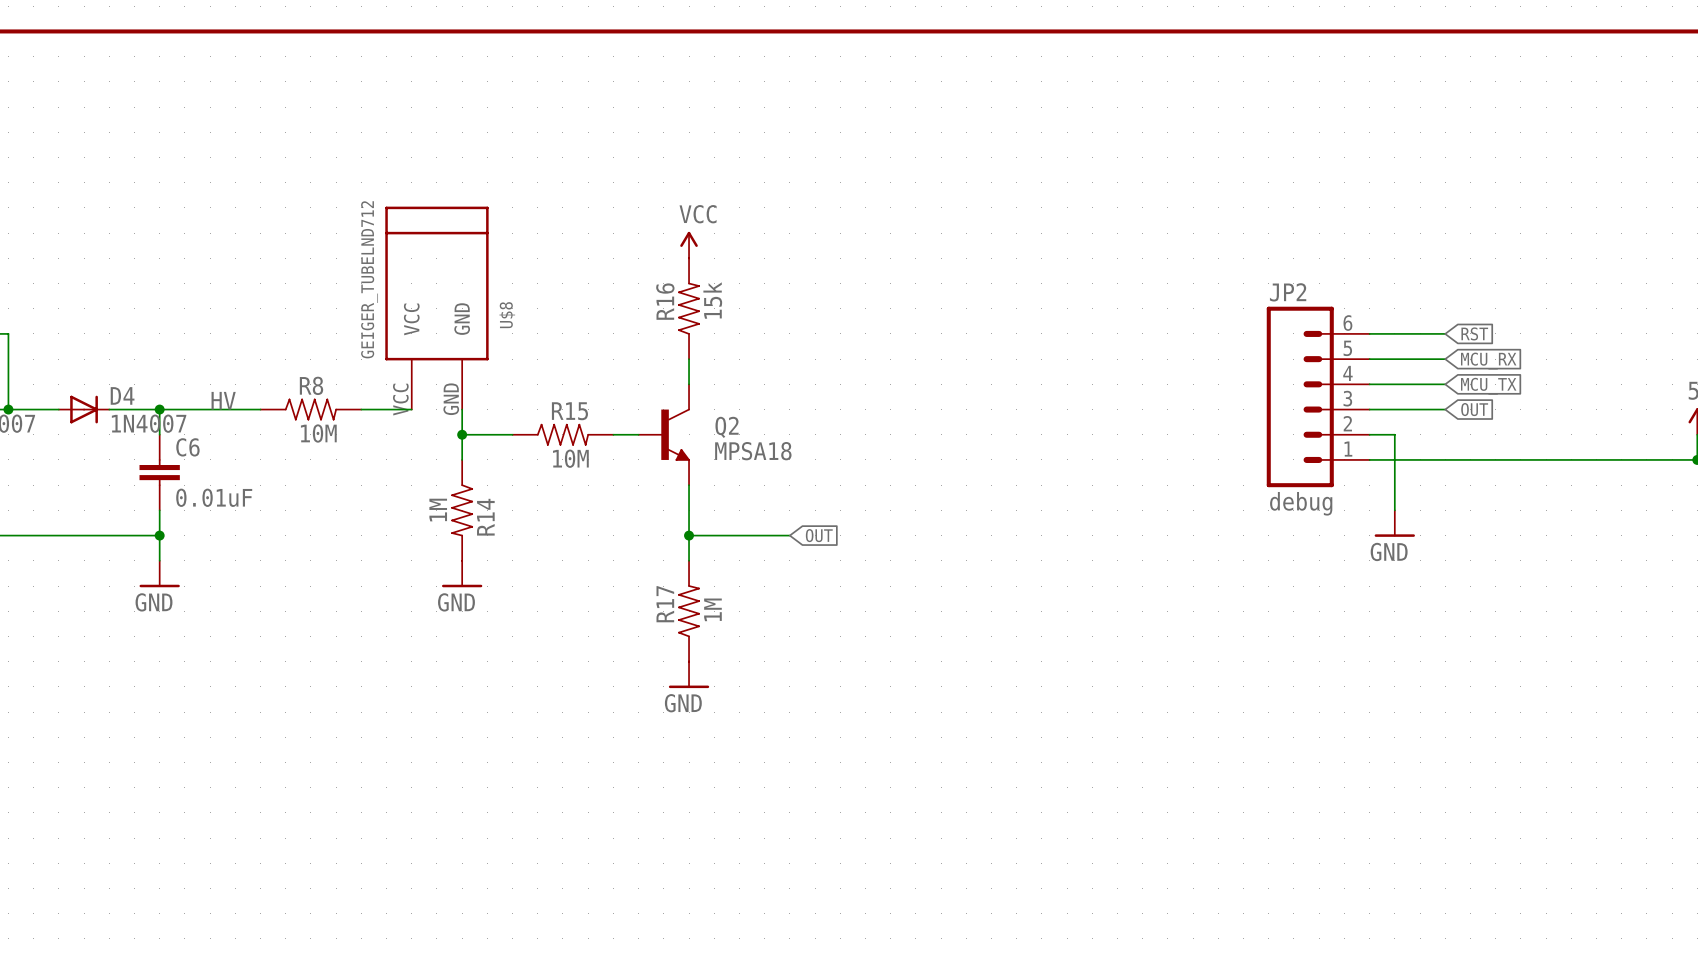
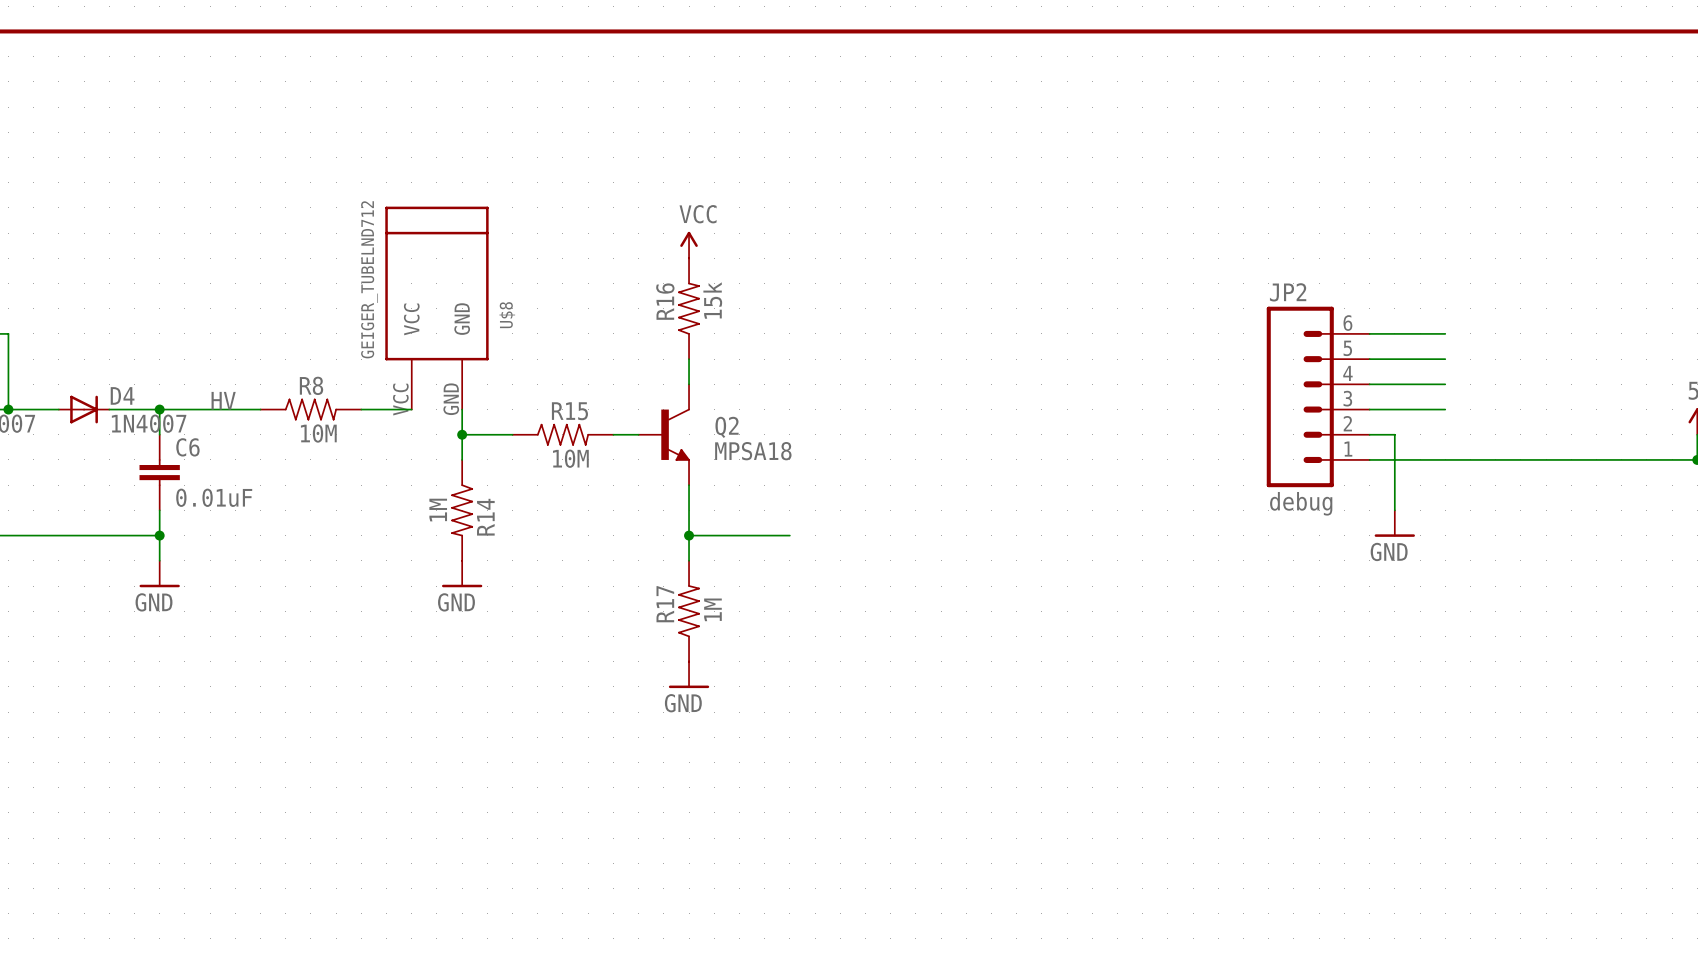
global label: RST (1474, 333) -> none
global label: MCU_RX (1488, 361) -> none
global label: MCU_TX (1488, 386) -> none
global label: OUT (1474, 409) -> none
global label: OUT (819, 535) -> none

